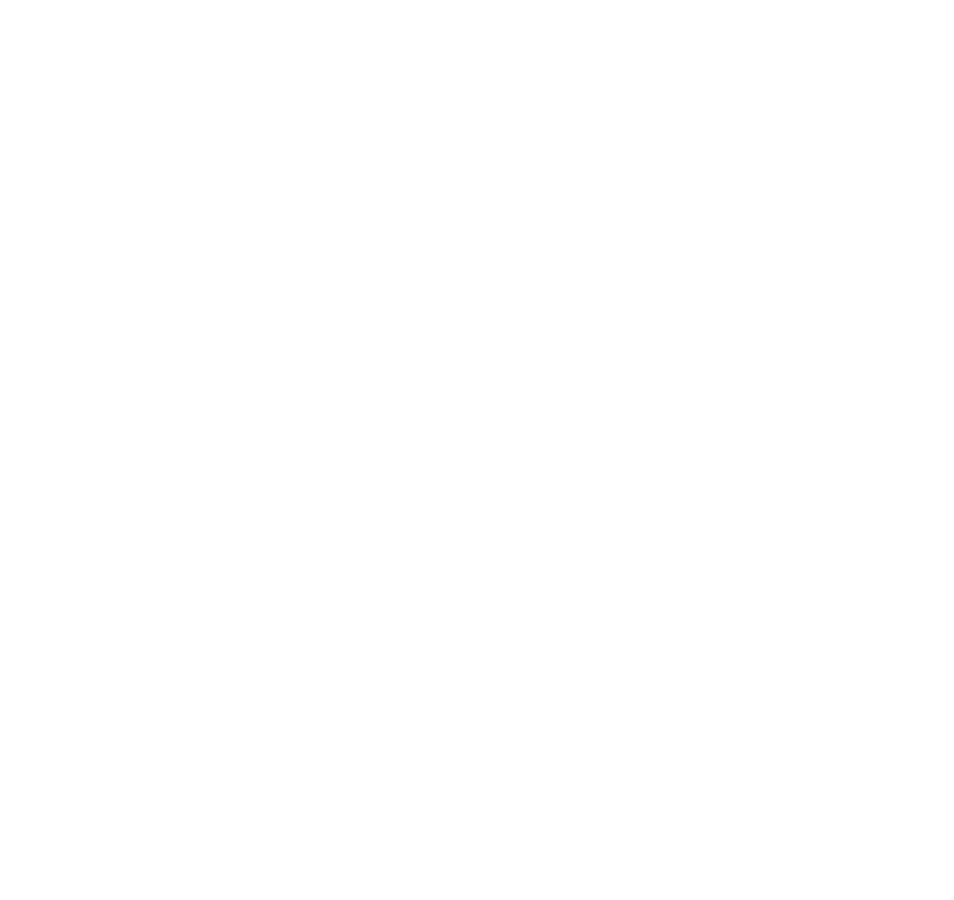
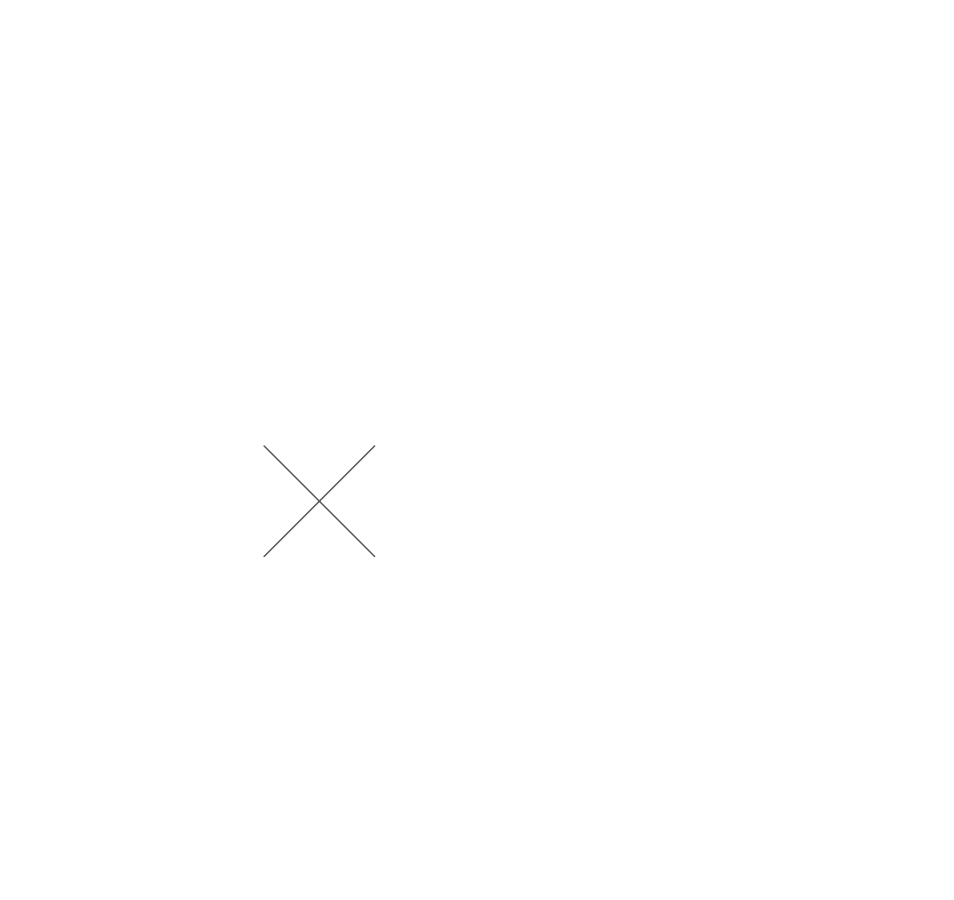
no-connect mark: none -> (319, 501)

